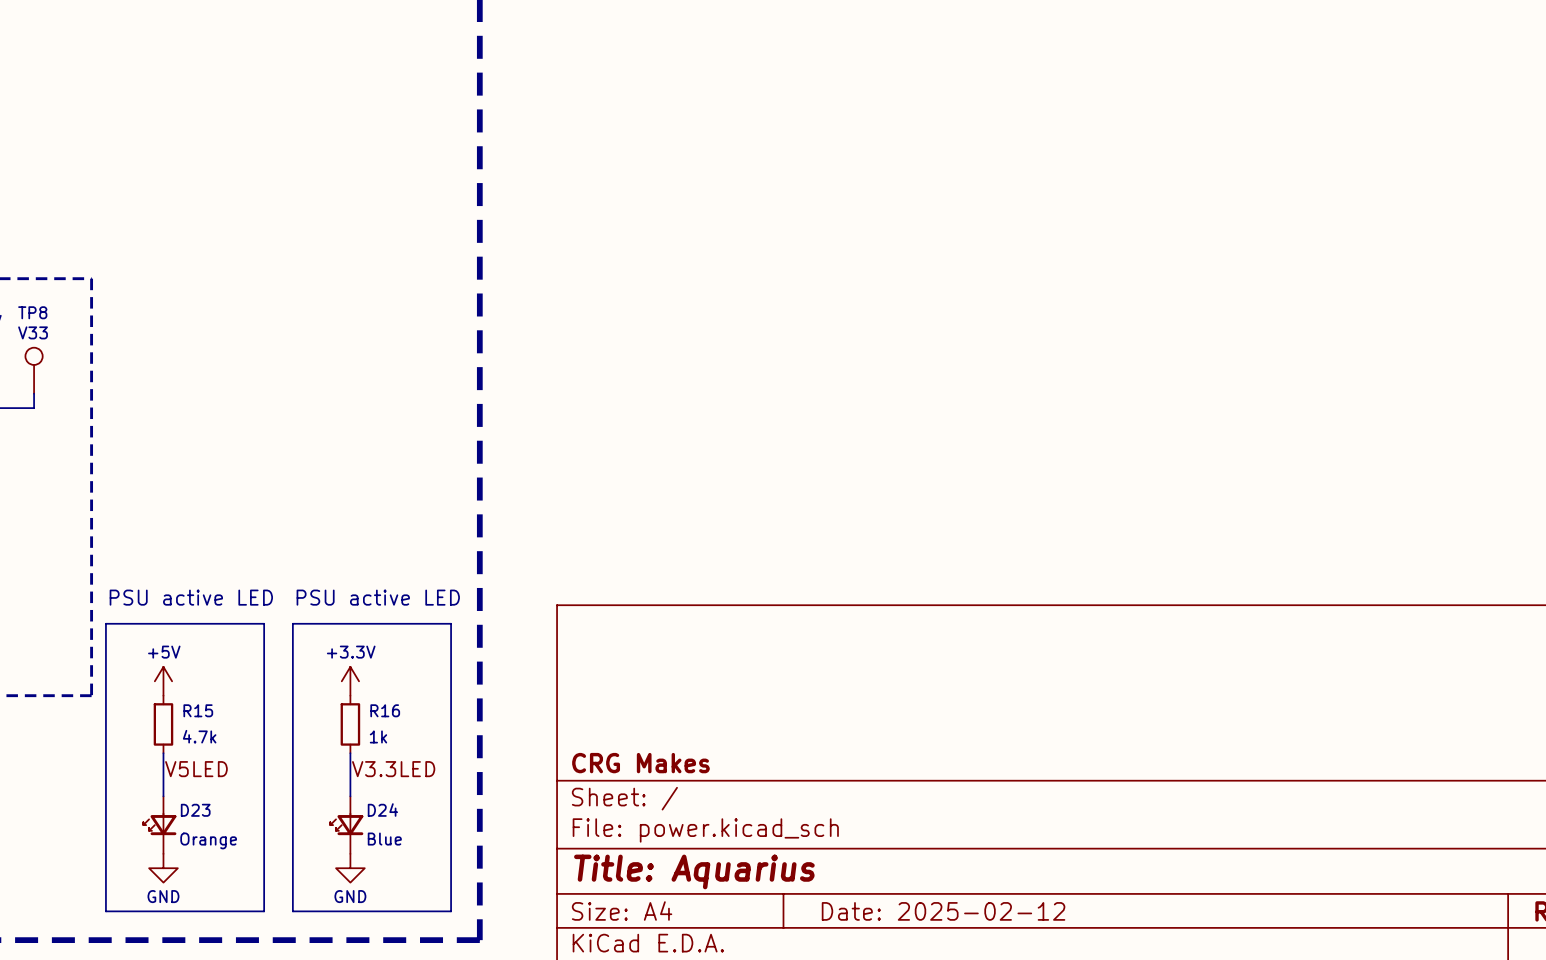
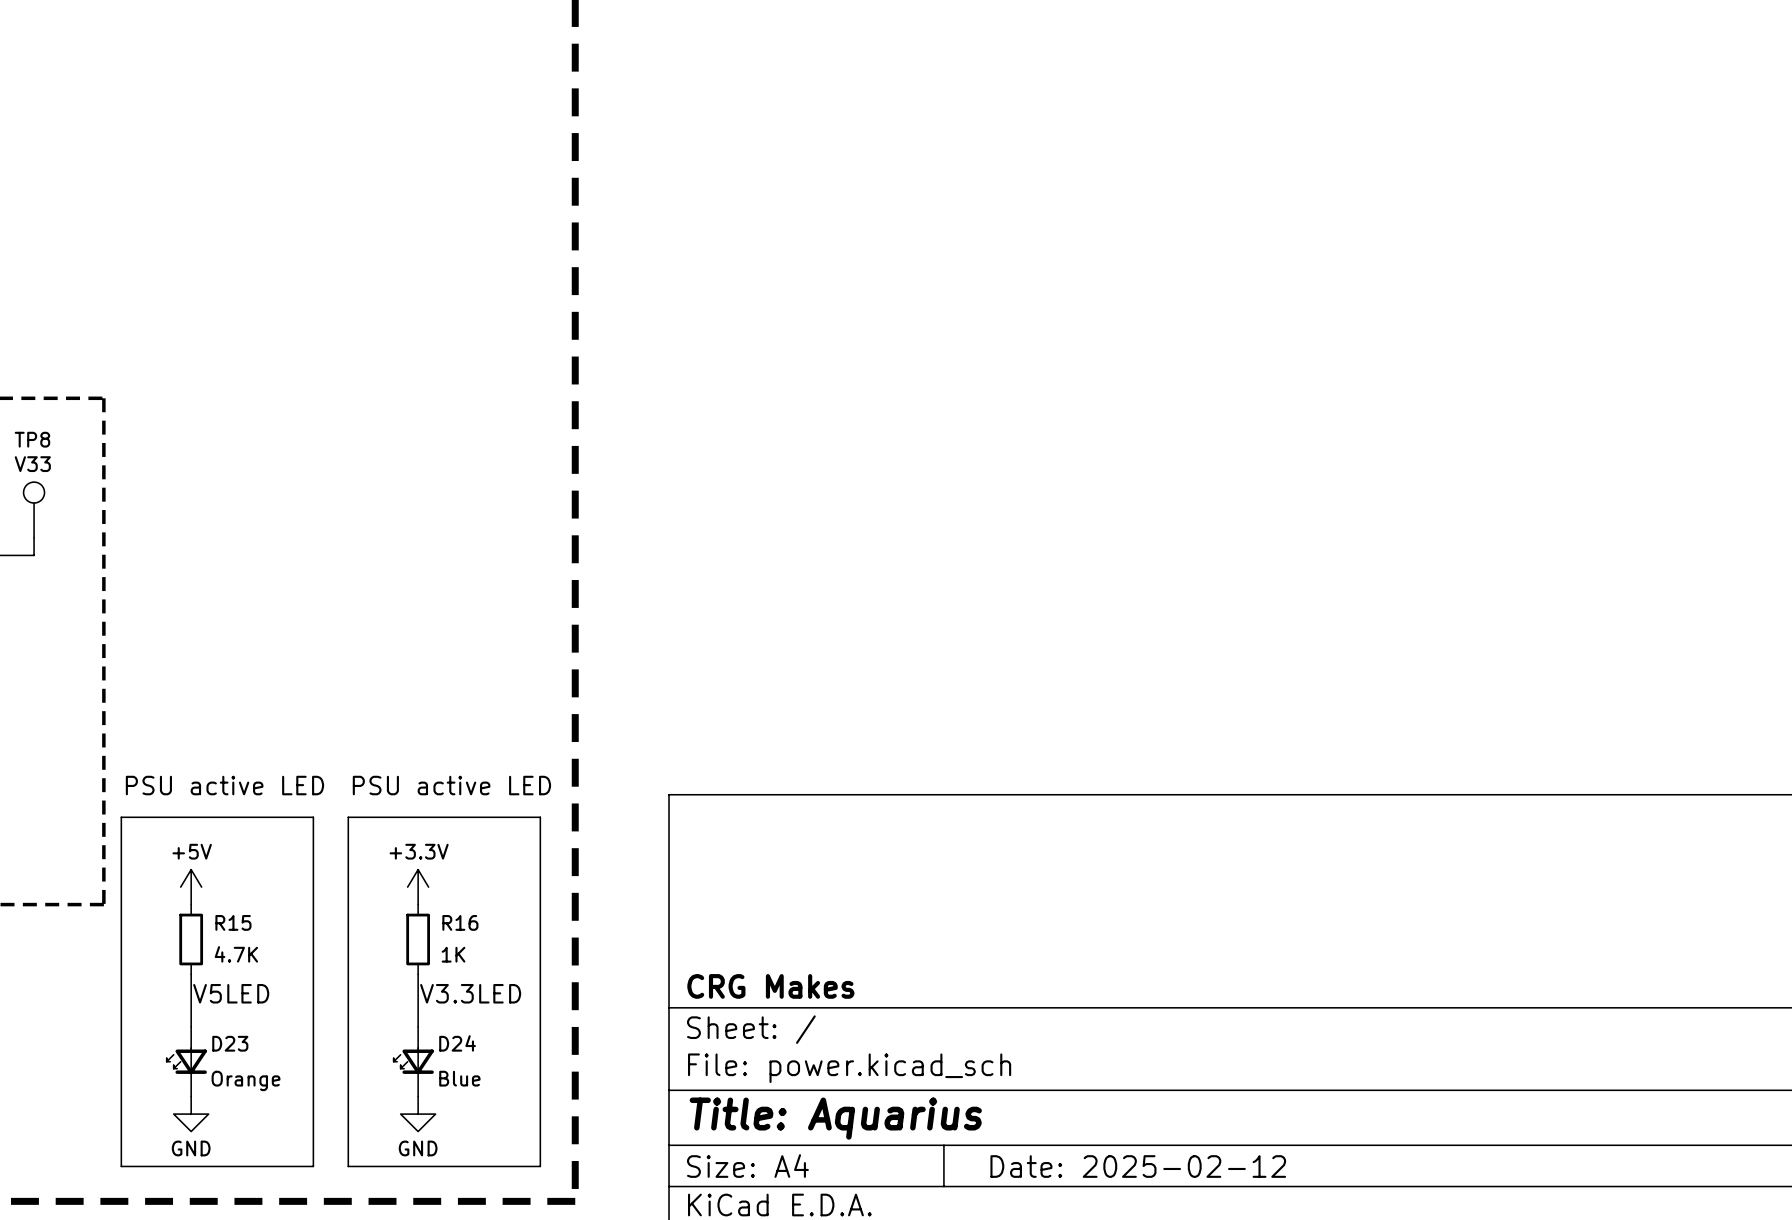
R15 value: 4.7k (199, 736) -> 4.7K (236, 954)
R16 value: 1k (378, 736) -> 1K (453, 954)

